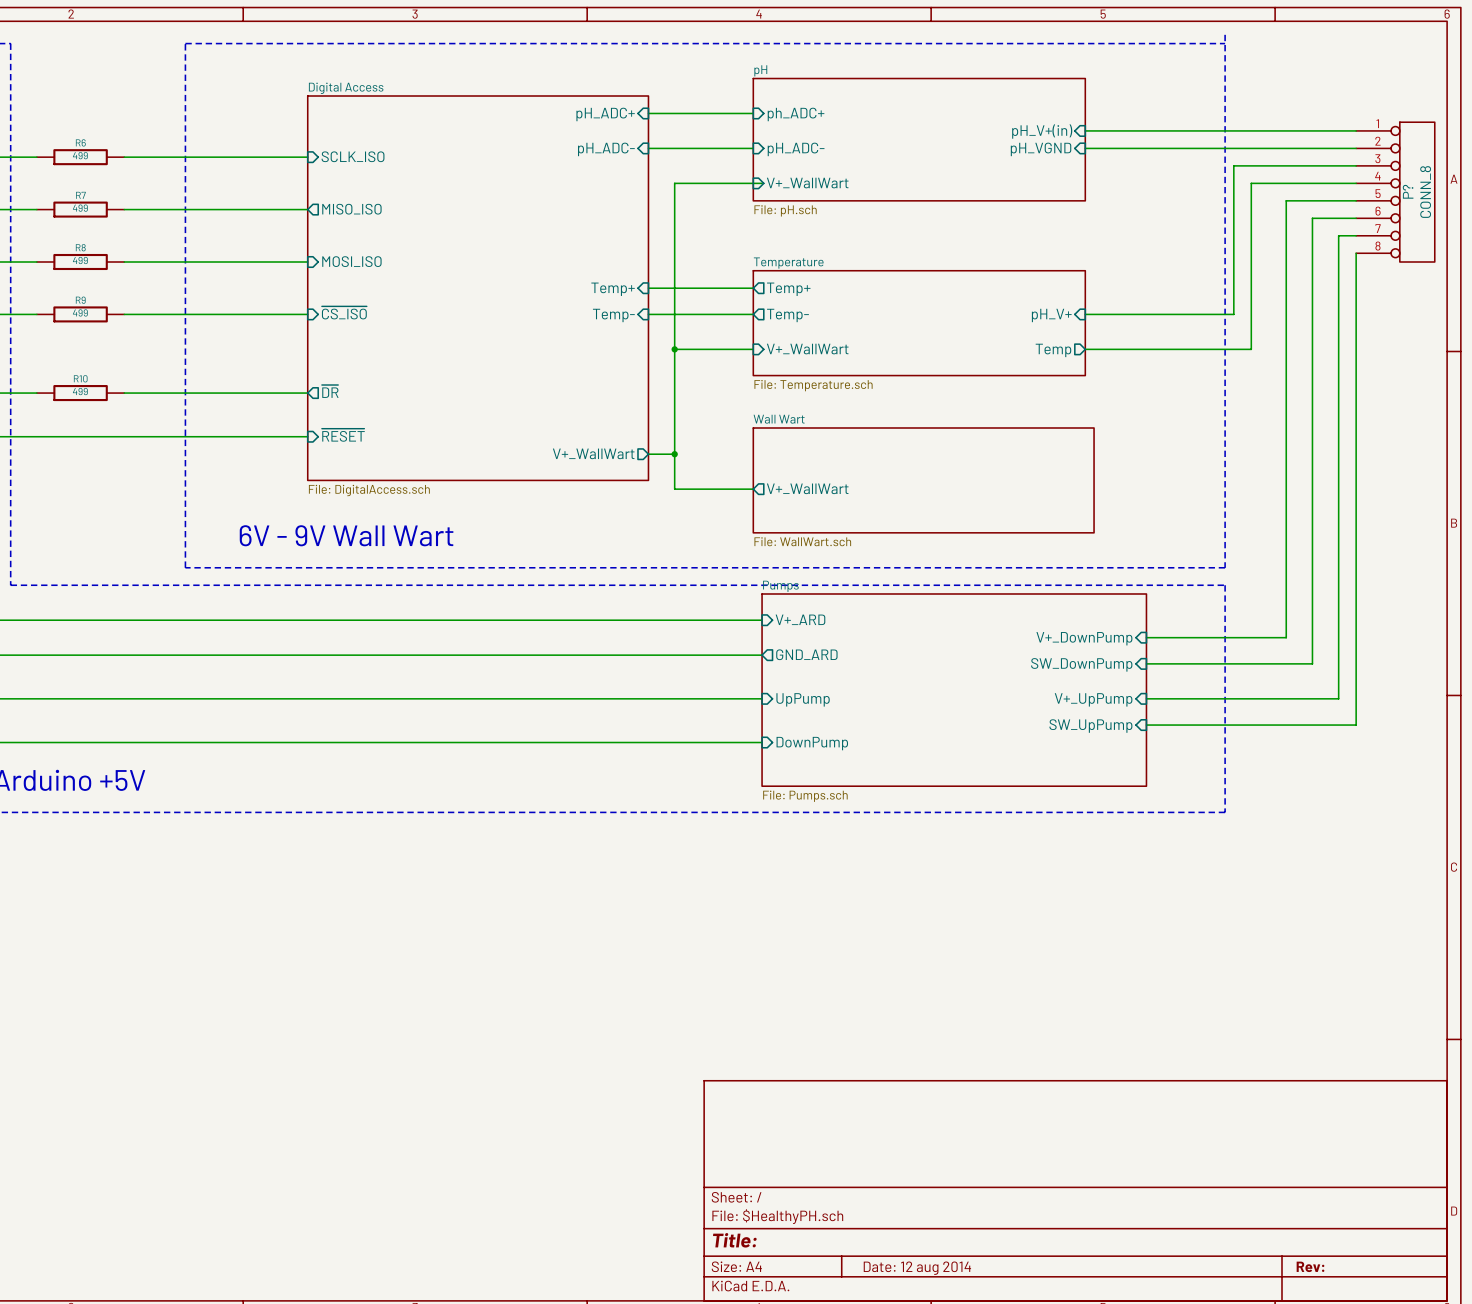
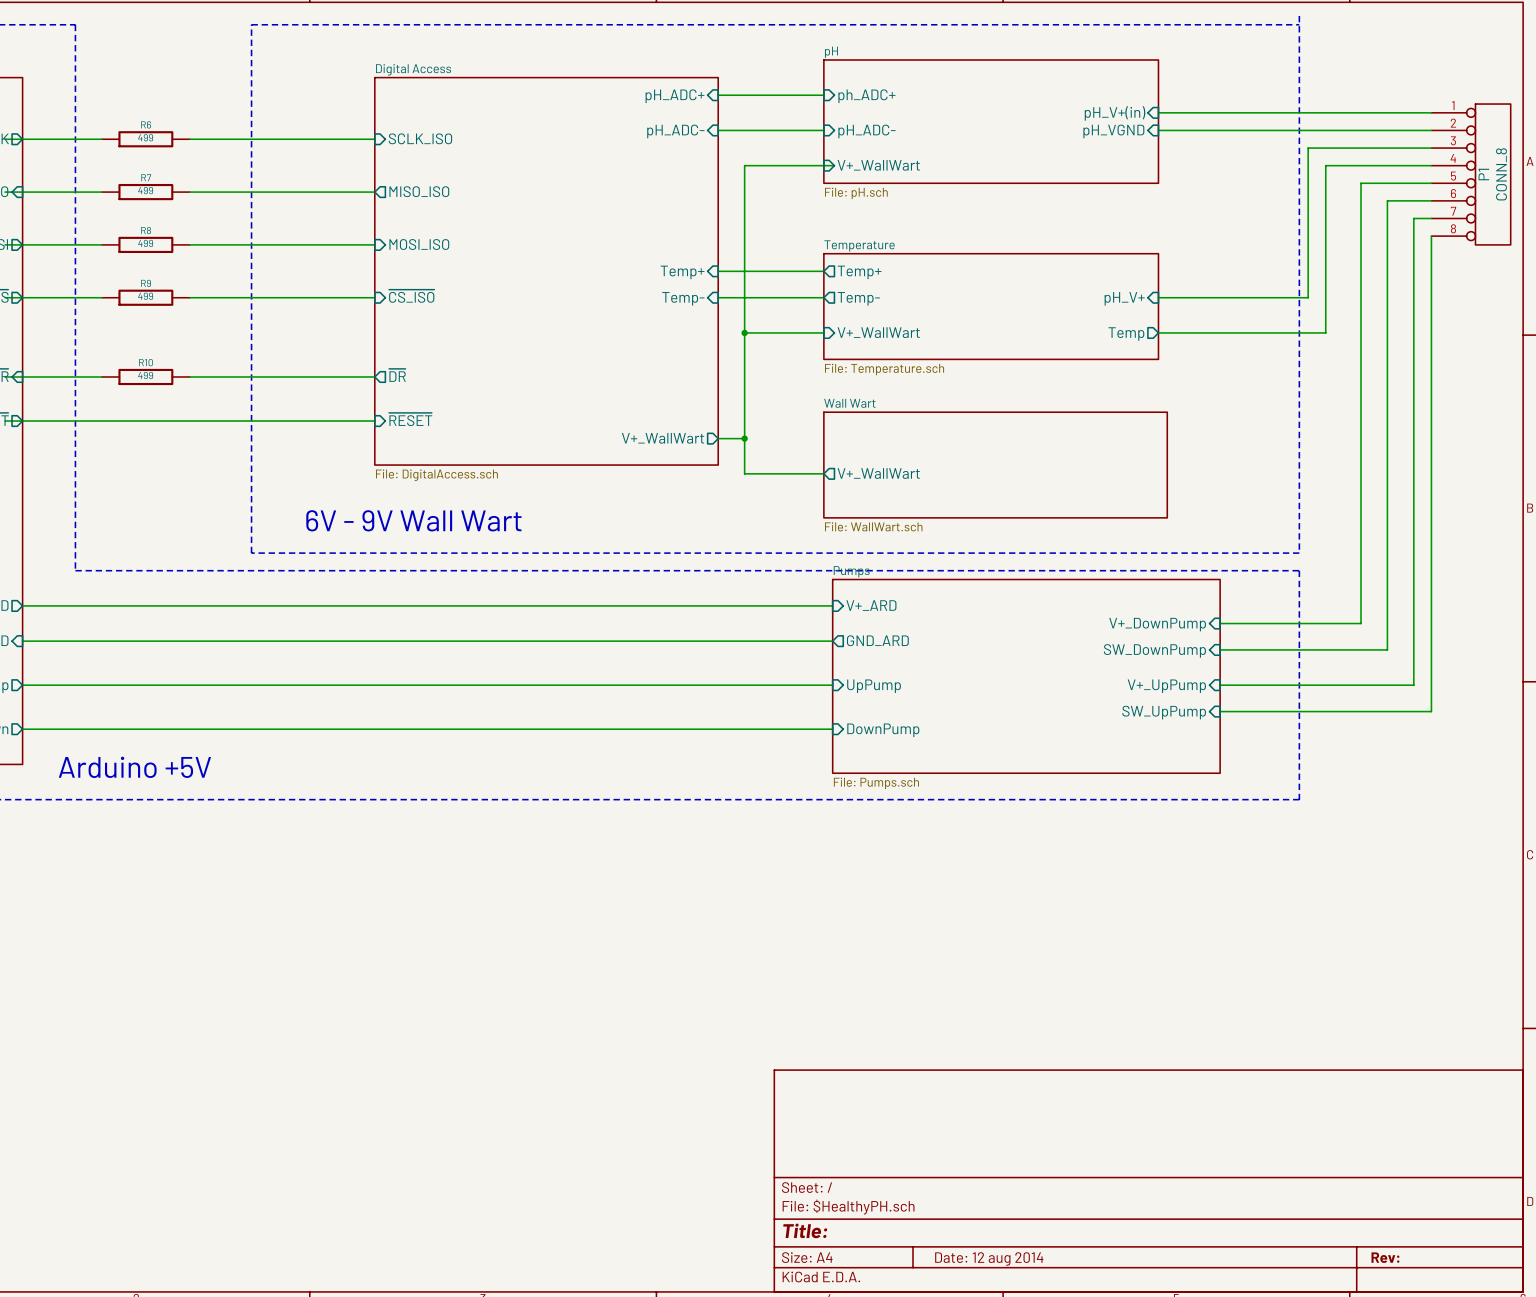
P? name: P? (1408, 191) -> P1 (1483, 174)

